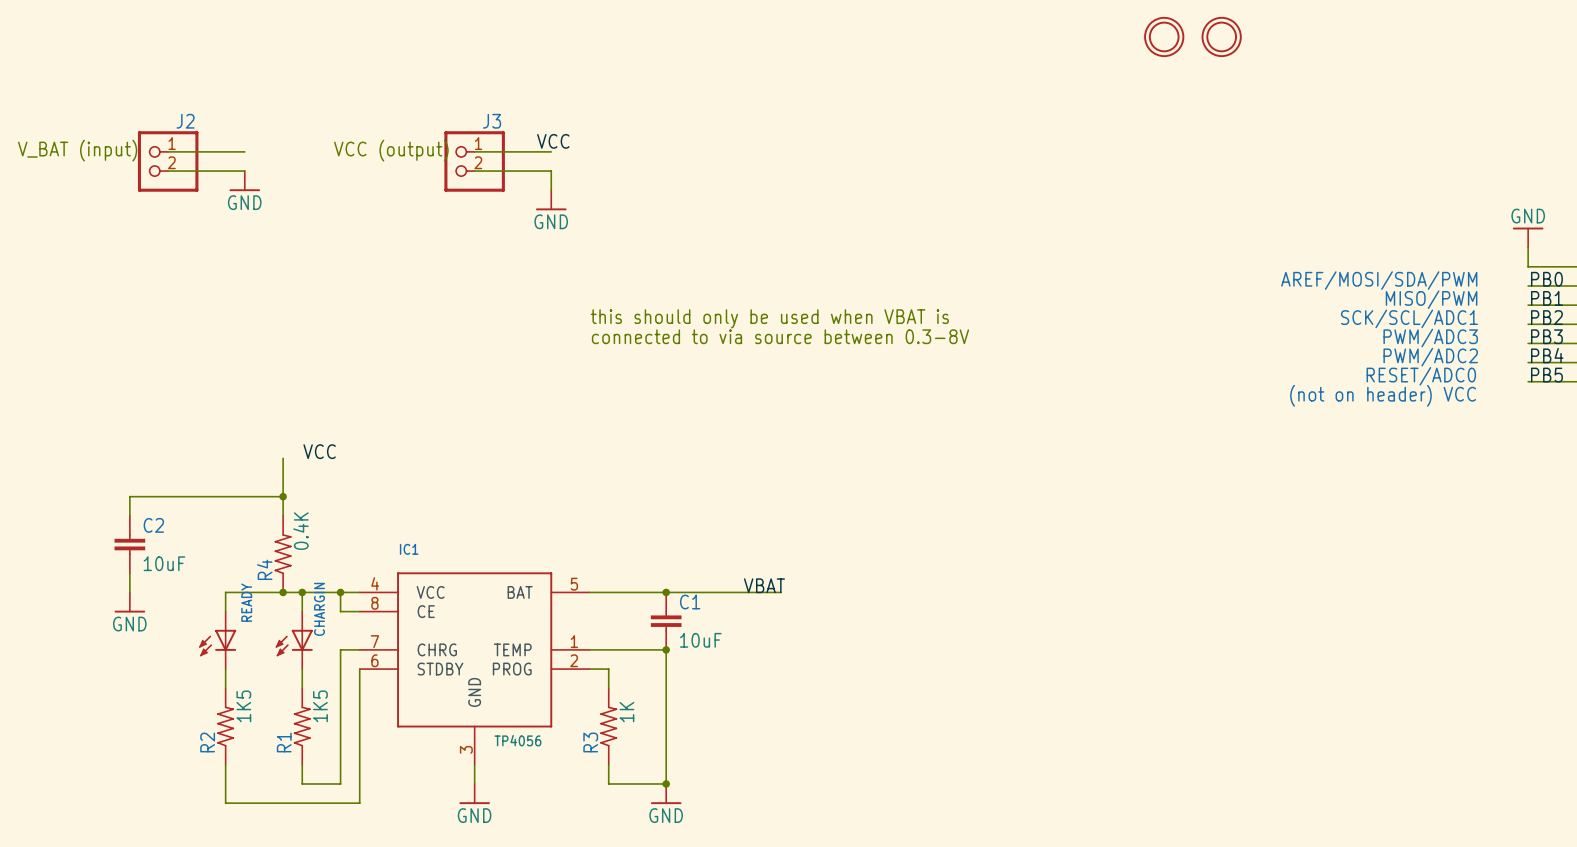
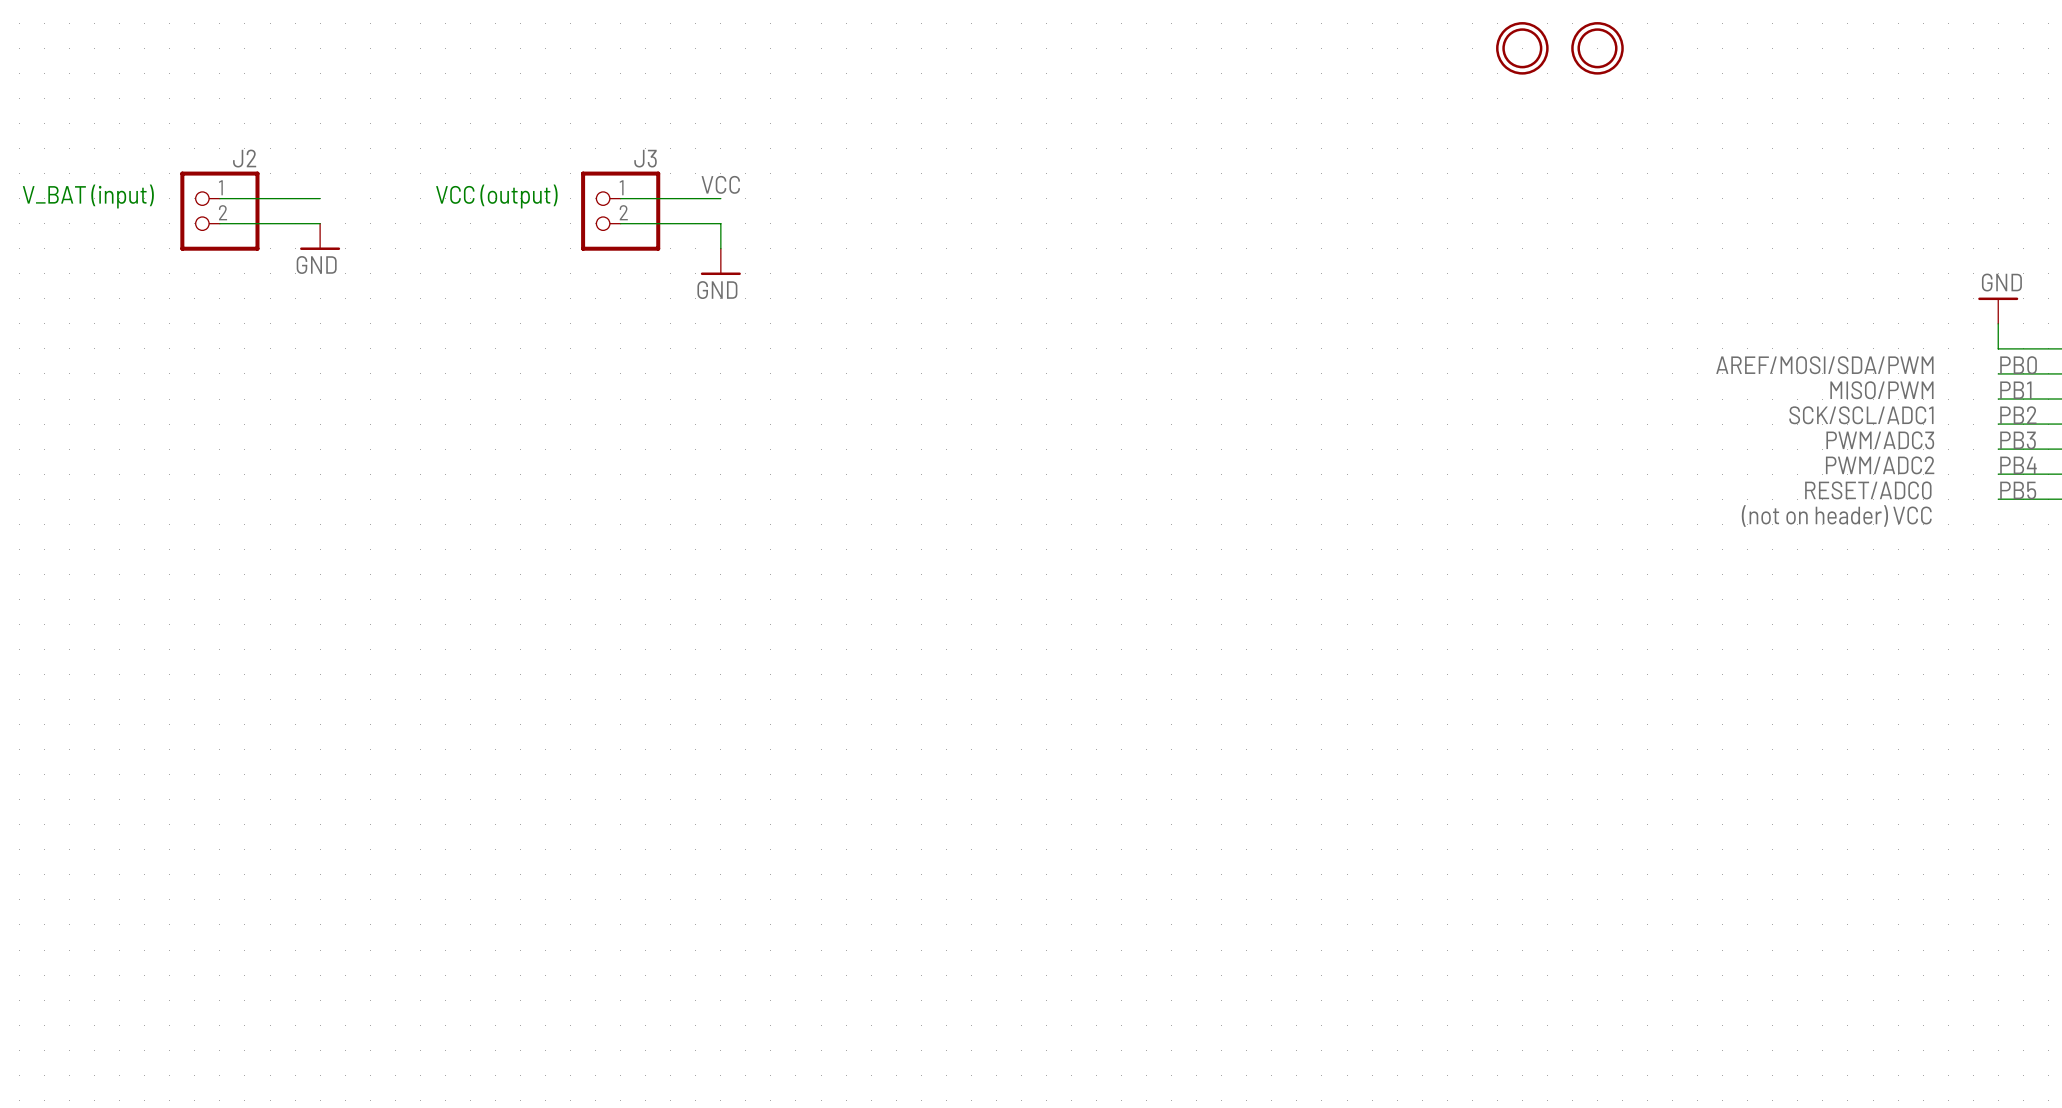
text: this should only be used when VBAT is (769, 318) -> none
text: connected to via source between 0.3-8V (780, 336) -> none
label: VCC (319, 451) -> none
wire: (283, 458) (283, 515) -> none
wire: (283, 496) (129, 496) (129, 515) -> none
junction: (283, 496) -> none
C2: 10uF (129, 544) -> none
R4: 0.4K (283, 554) -> none
wire: (129, 573) (129, 592) -> none
label: VBAT (764, 585) -> none
junction: (283, 592) -> none
wire: (302, 592) (302, 611) -> none
junction: (302, 592) -> none
wire: (340, 592) (340, 611) (359, 611) -> none
junction: (340, 592) -> none
wire: (359, 592) (225, 592) (225, 611) -> none
wire: (589, 592) (781, 592) -> none
junction: (666, 592) -> none
power symbol: GND (129, 602) -> none
C1: 10uF (666, 621) -> none
READY: (217, 640) -> none
CHARGIN: (294, 640) -> none
wire: (359, 649) (340, 649) (340, 783) (302, 783) (302, 764) -> none
wire: (589, 649) (666, 649) (666, 783) (608, 783) (608, 764) -> none
junction: (666, 649) -> none
IC1: TP4056 (474, 668) -> none
wire: (225, 669) (225, 688) -> none
wire: (302, 669) (302, 688) -> none
wire: (359, 669) (359, 803) (225, 803) (225, 764) -> none
wire: (589, 669) (608, 669) (608, 688) -> none
R2: 1K5 (225, 726) -> none
R1: 1K5 (302, 726) -> none
R3: 1K (608, 726) -> none
wire: (474, 764) (474, 783) -> none
junction: (666, 783) -> none
power symbol: GND (474, 794) -> none
power symbol: GND (666, 794) -> none

